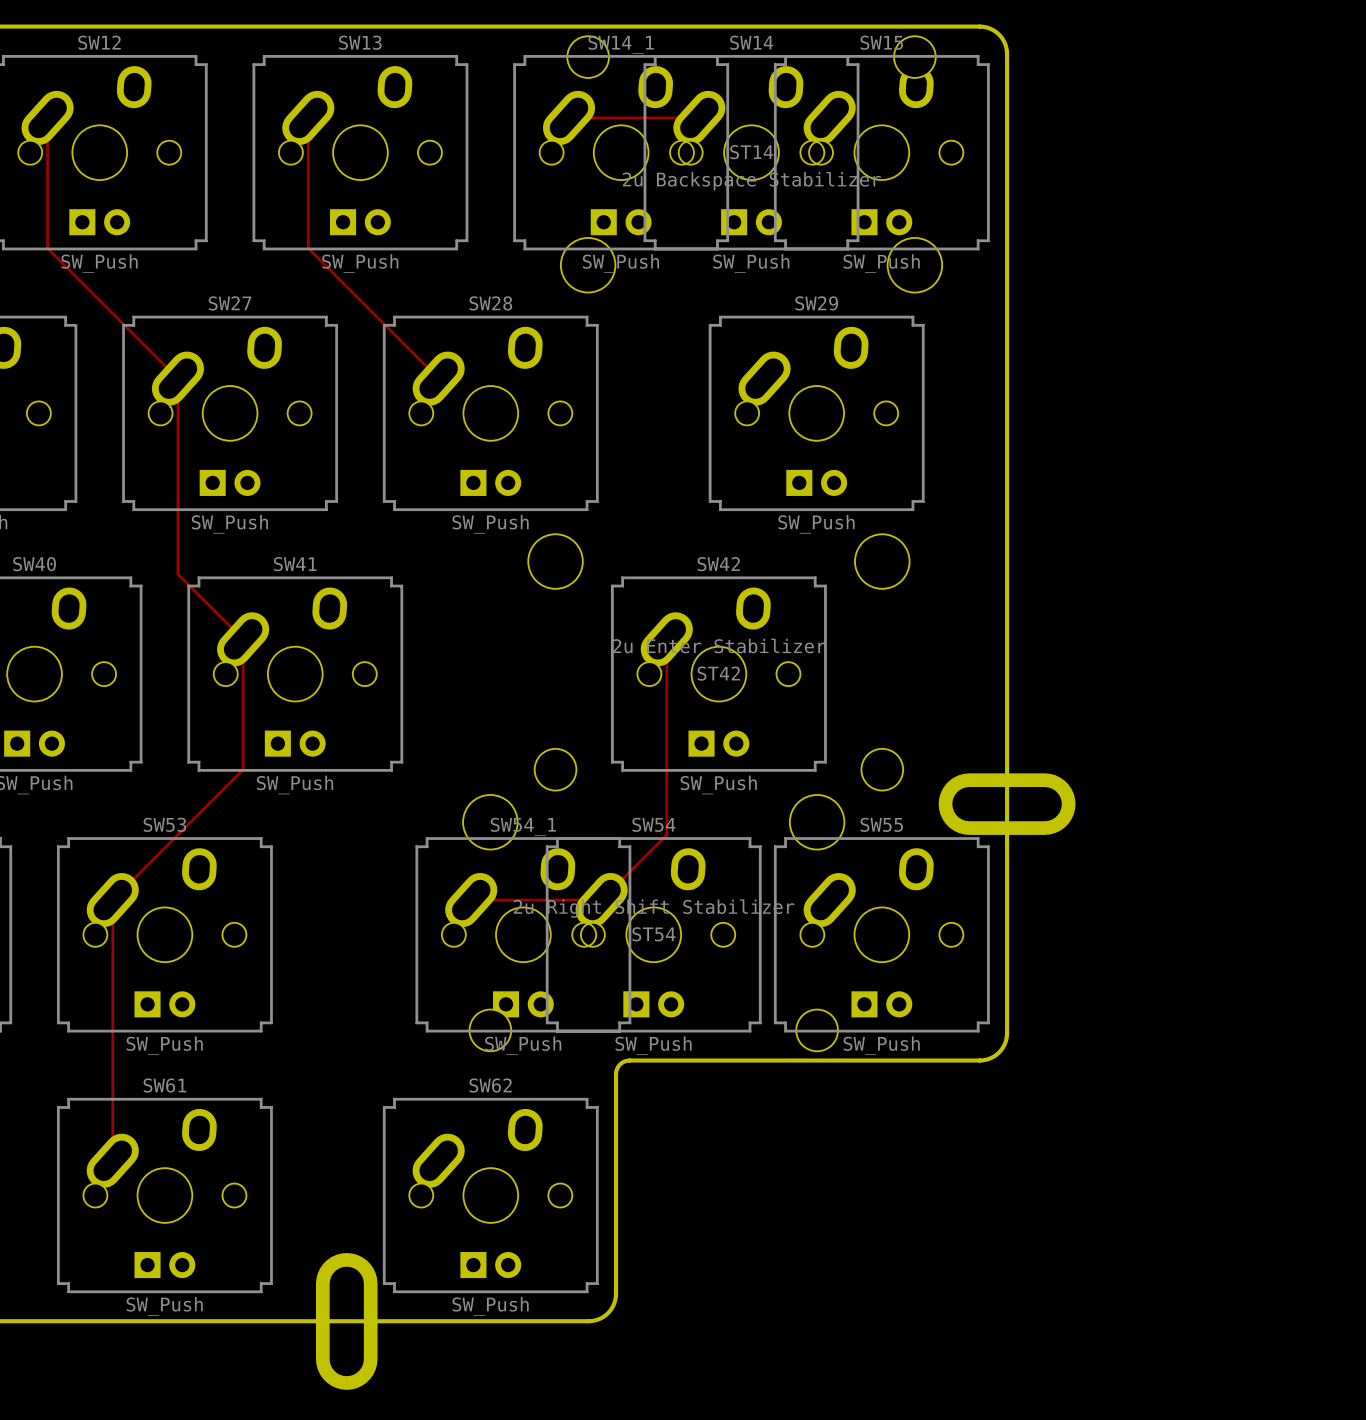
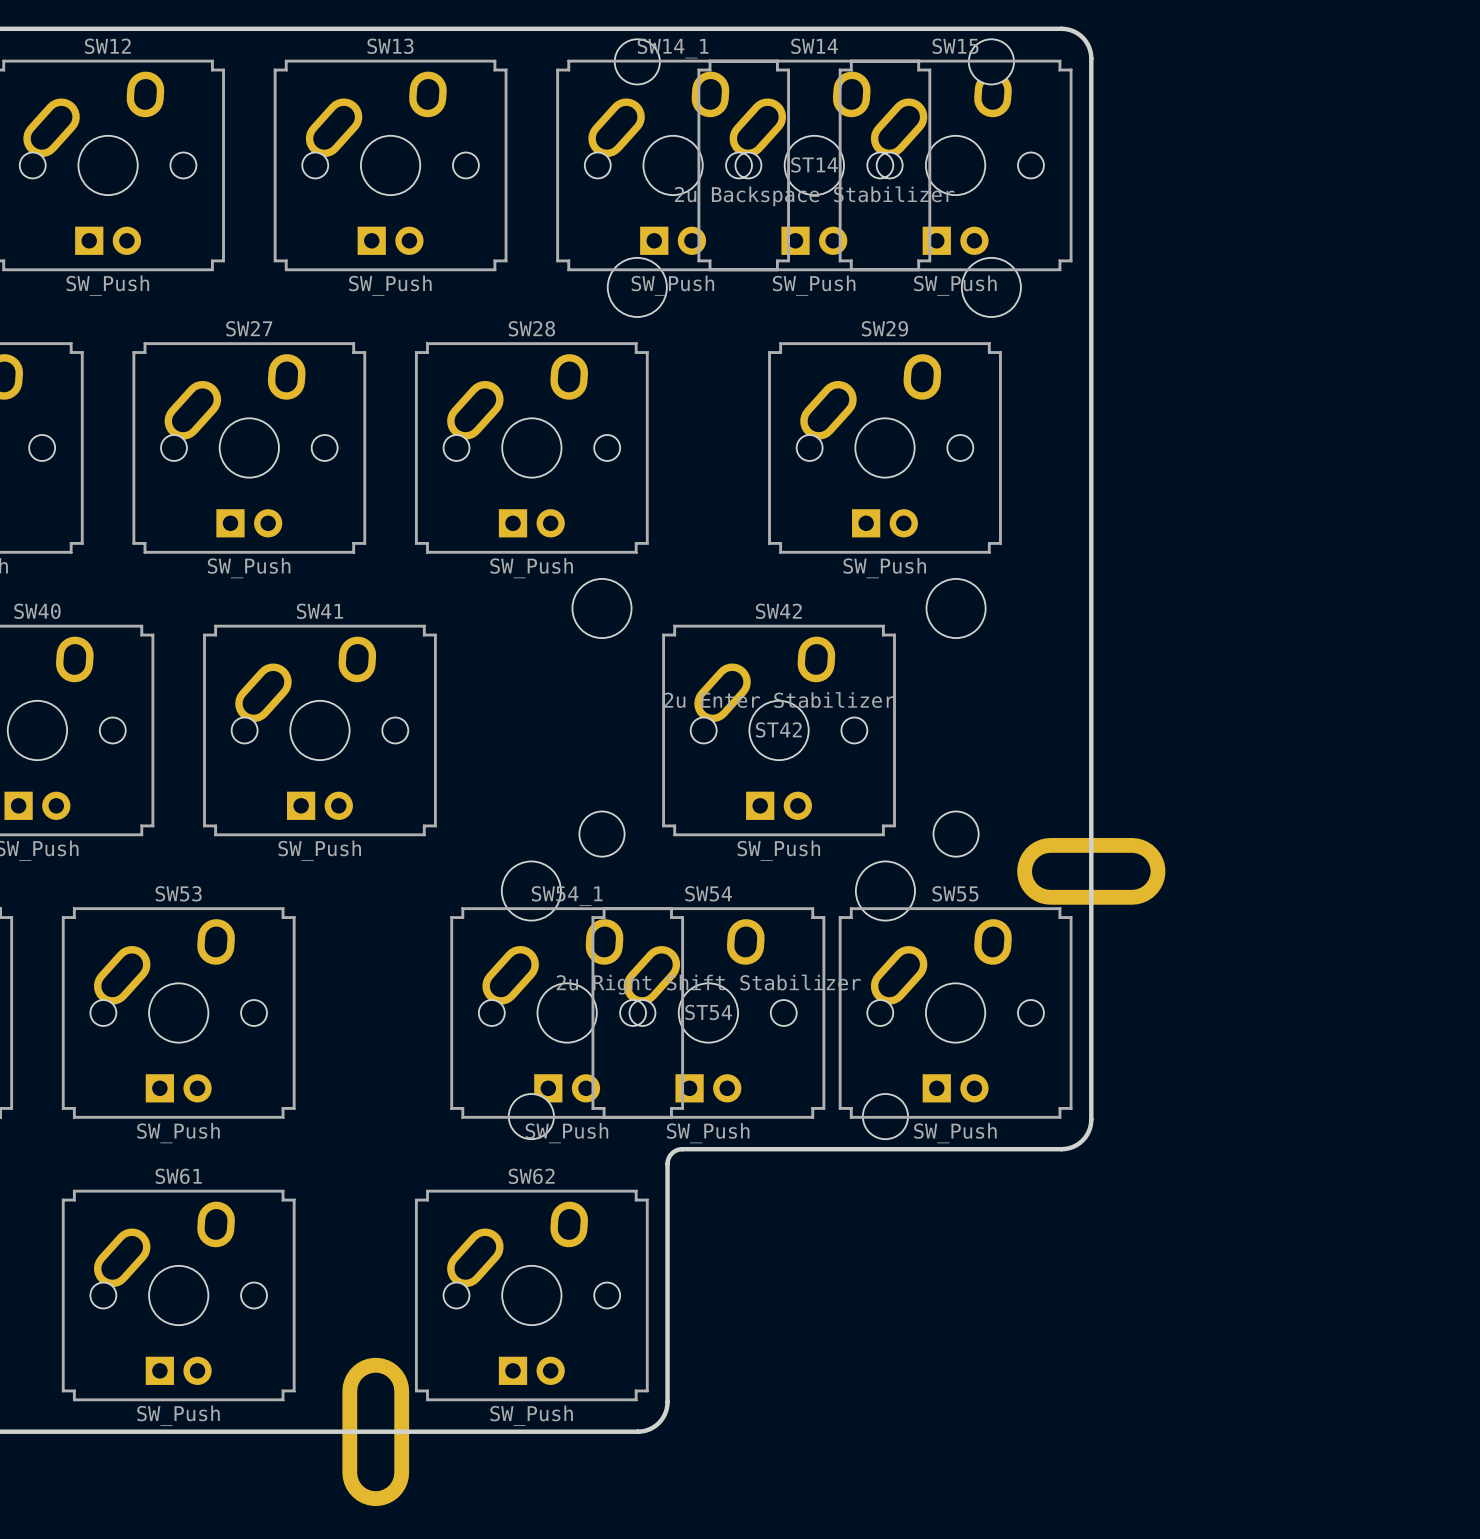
track: (47, 117) (47, 248) (177, 378) (177, 574) (243, 639) (243, 769) (112, 900) (112, 1160) -> none
track: (308, 117) (308, 248) (438, 378) -> none
track: (569, 117) (699, 117) -> none
track: (666, 639) (666, 834) (601, 900) (471, 900) -> none

